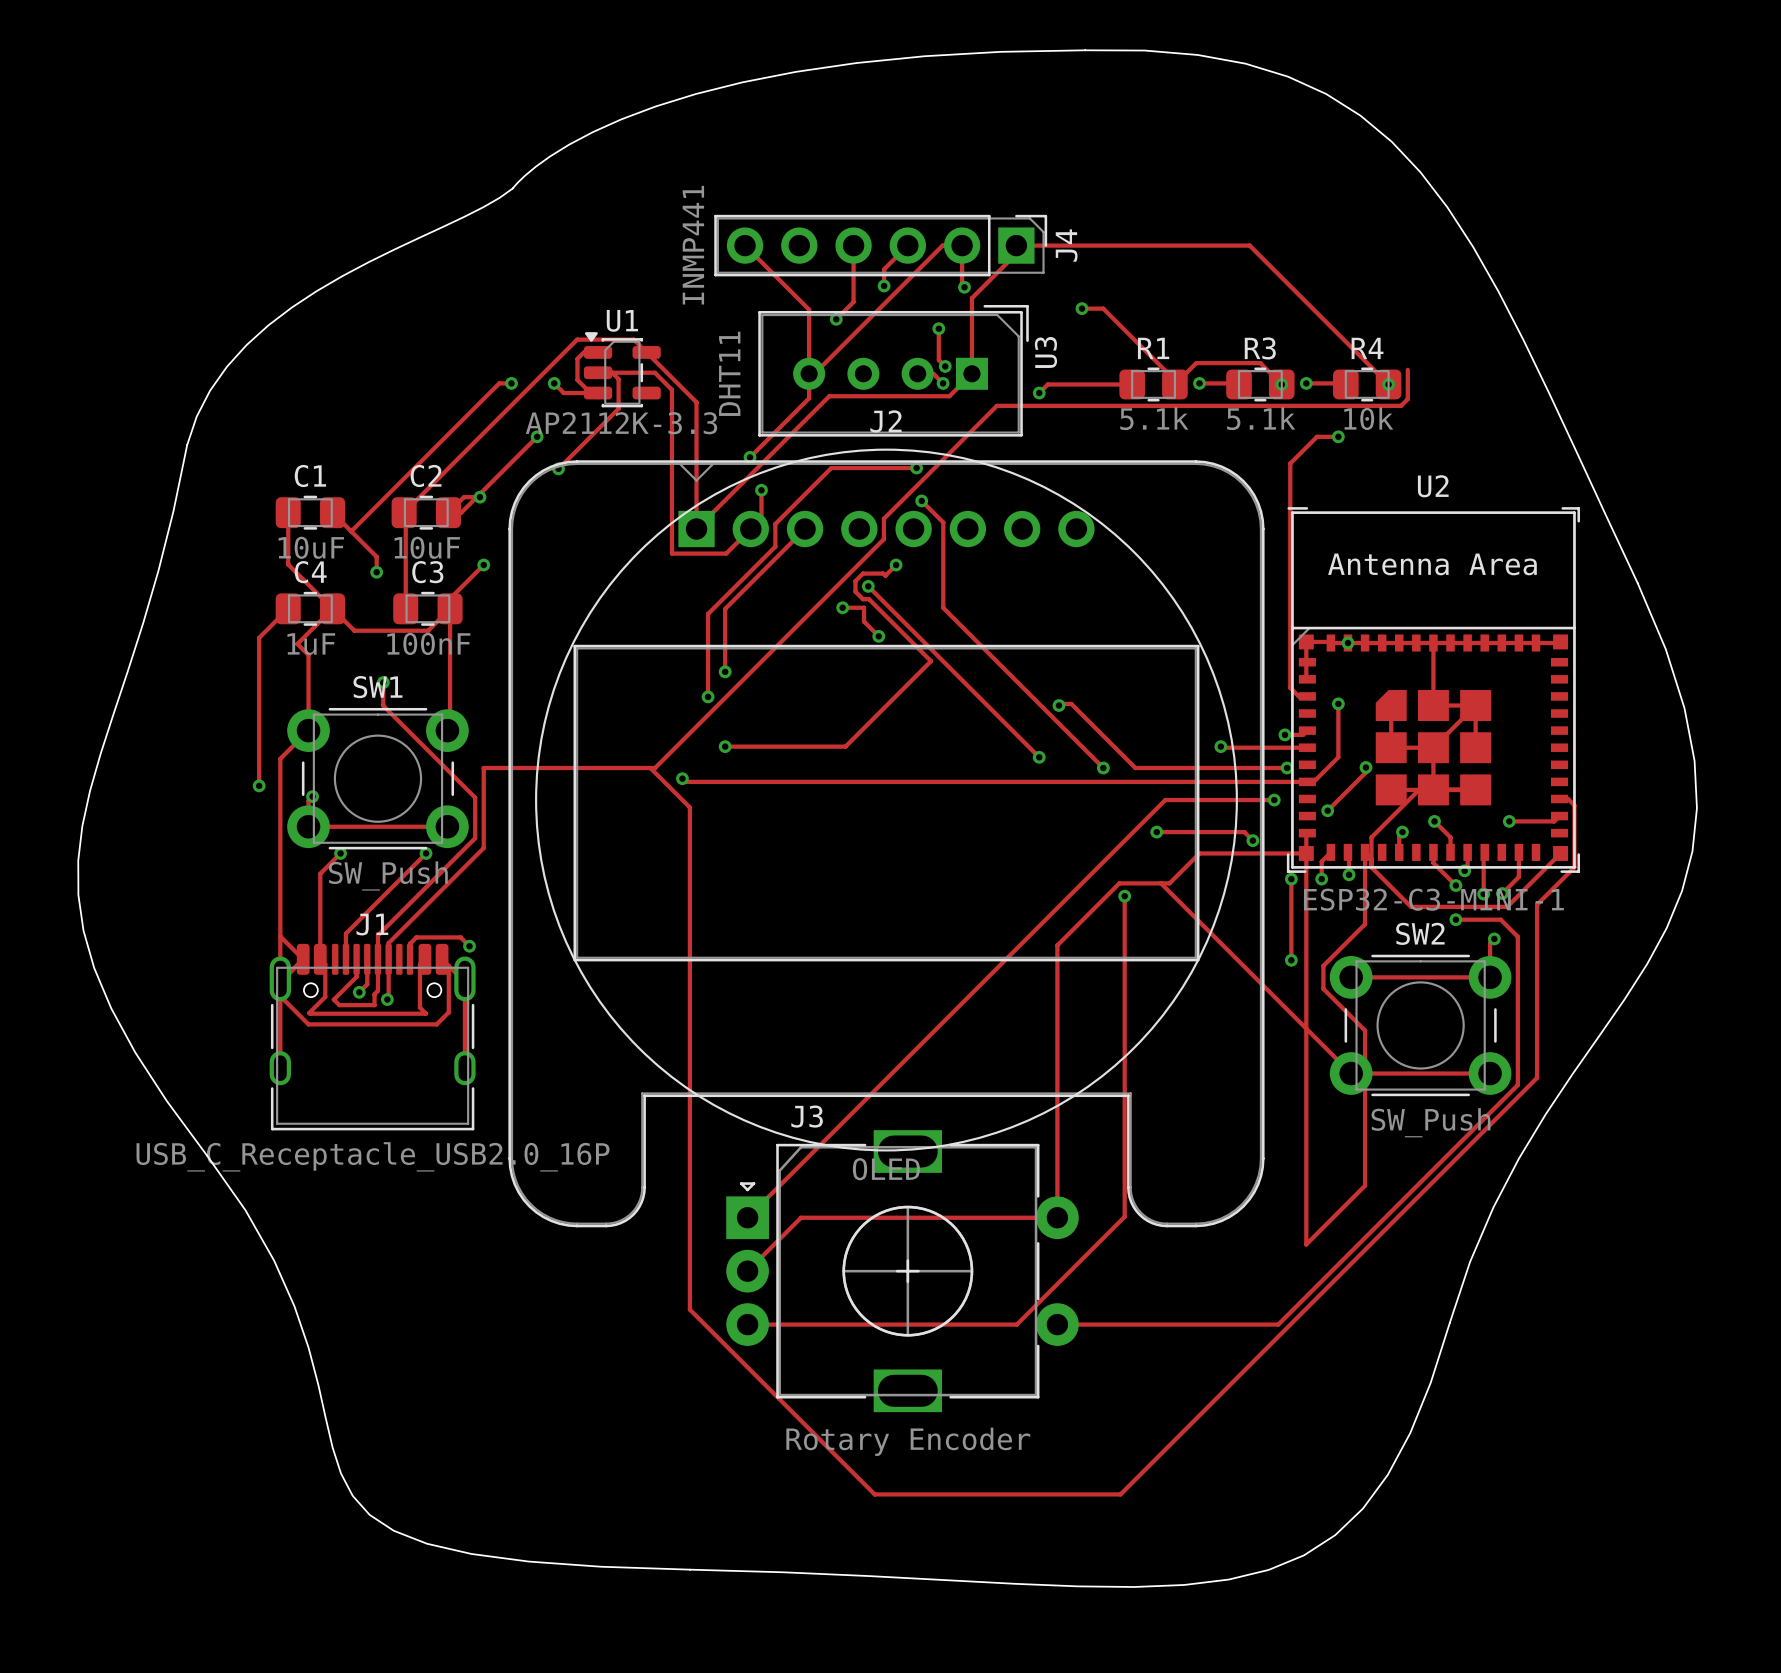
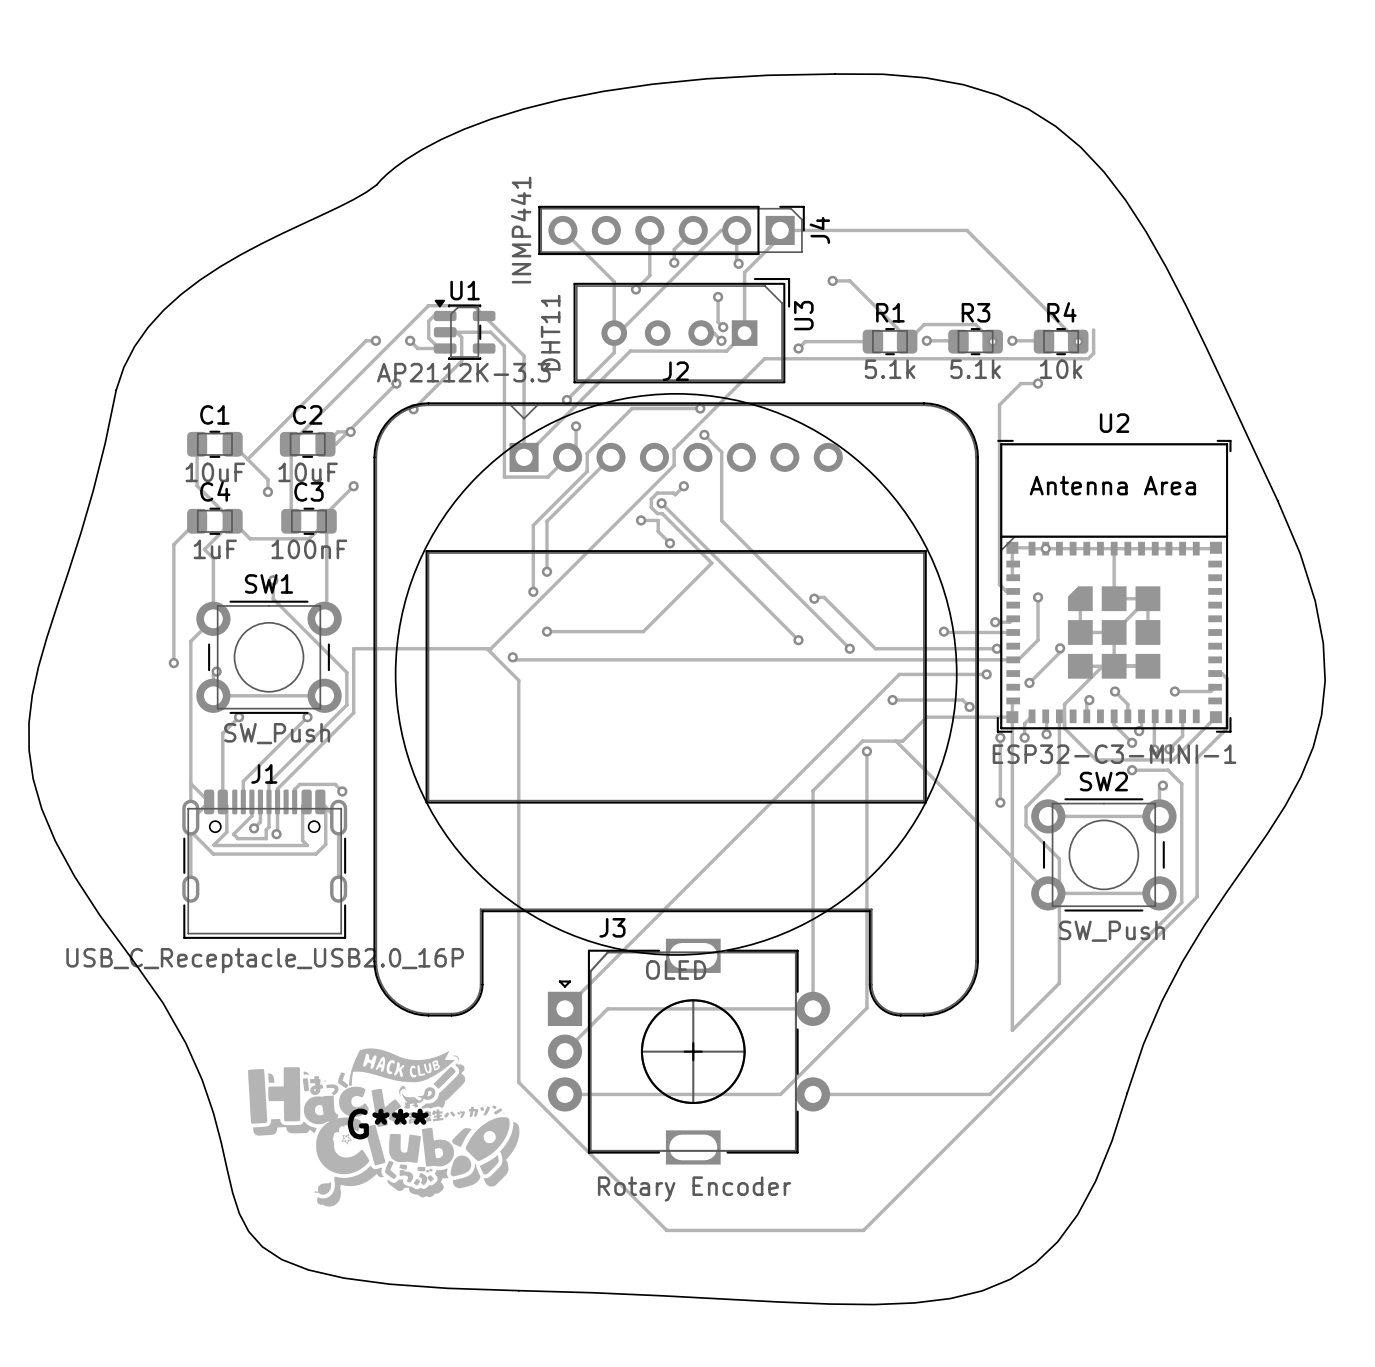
G***: none -> (383, 1127)

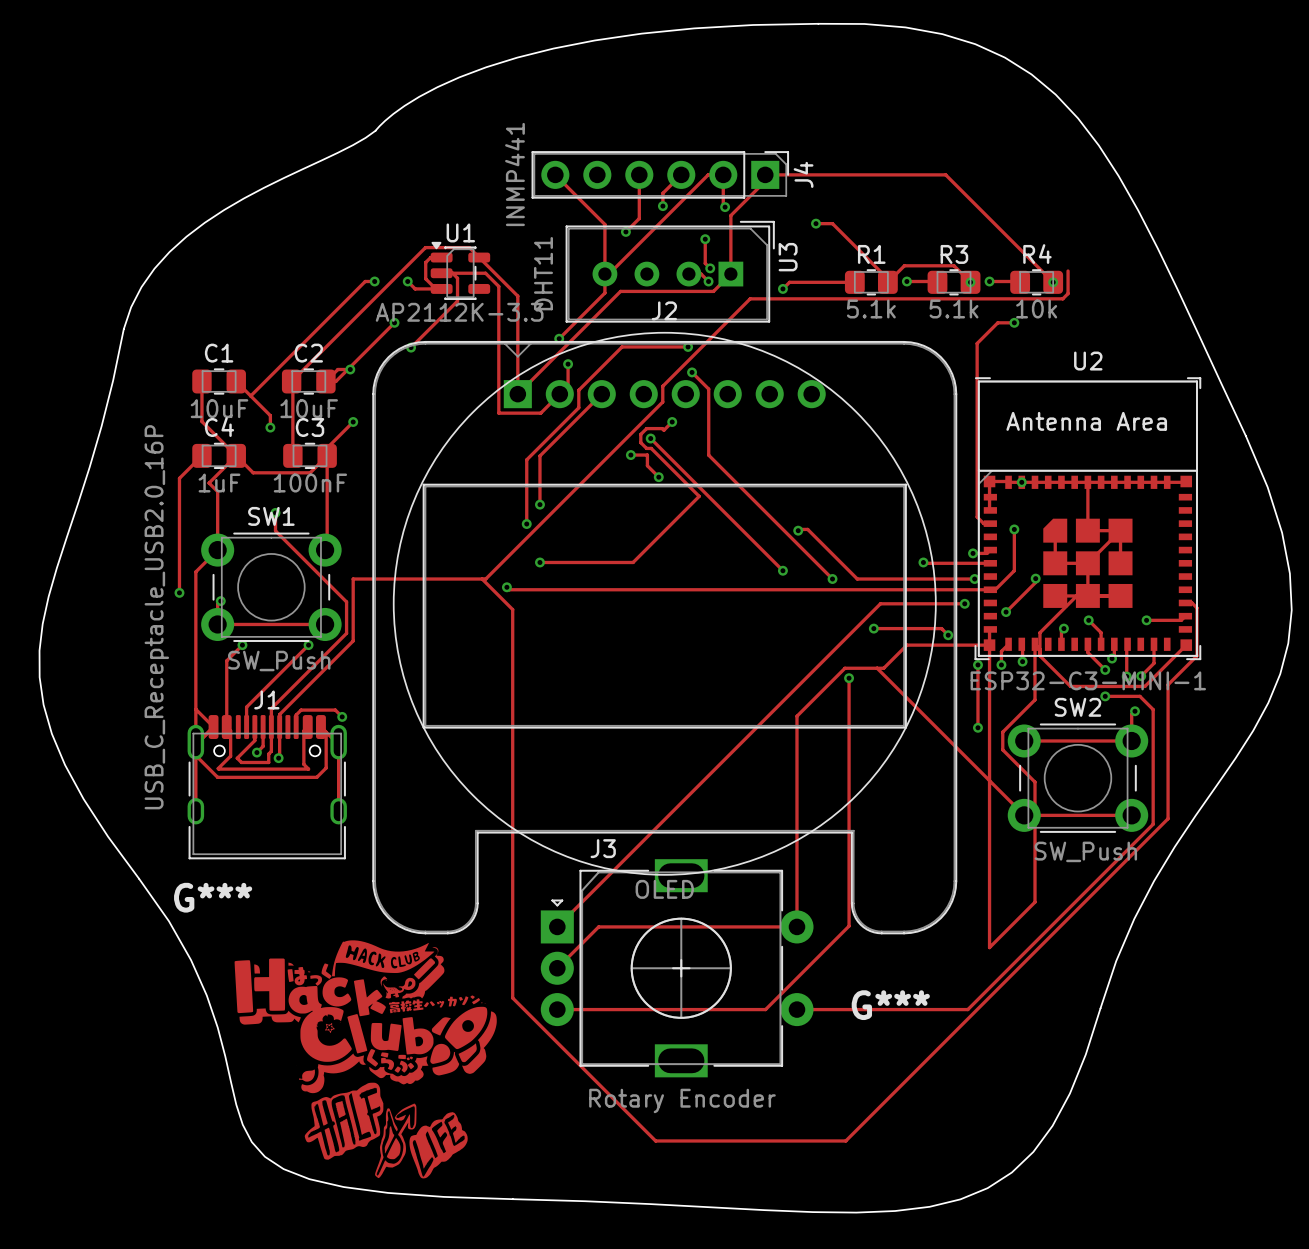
J1 value rotation: 0° (265, 960) -> 90° counterclockwise (156, 617)
G*** name position: G*** (388, 1124) -> G*** (213, 897)
G*** position: (383, 1127) -> (365, 1016)
G***: none -> (386, 1130)

